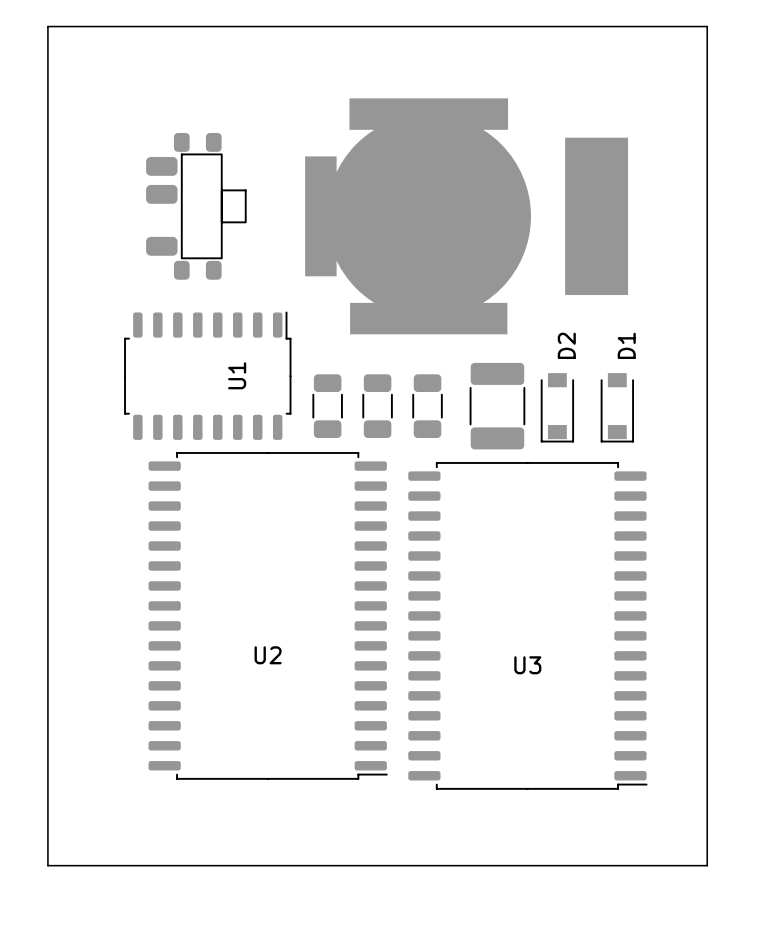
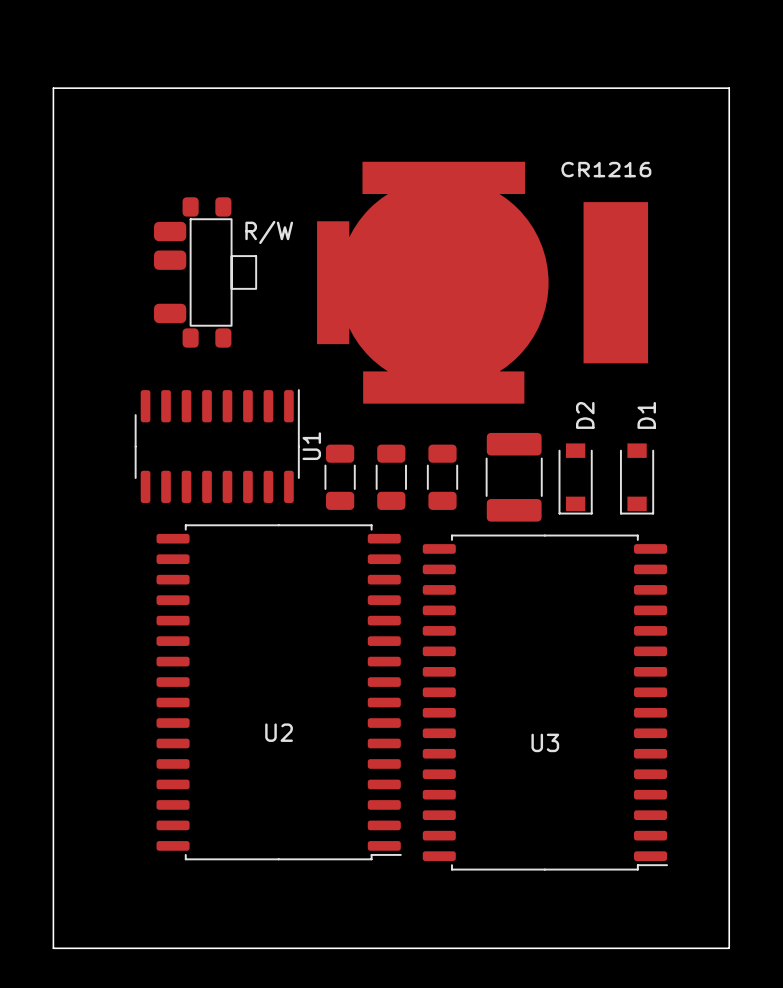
text: none -> CR1216 (606, 169)
text: none -> R/W (269, 232)
U1 footprint: [124, 311, 292, 440] -> [134, 389, 300, 503]
U1 name position: U1 (237, 375) -> U1 (311, 446)

